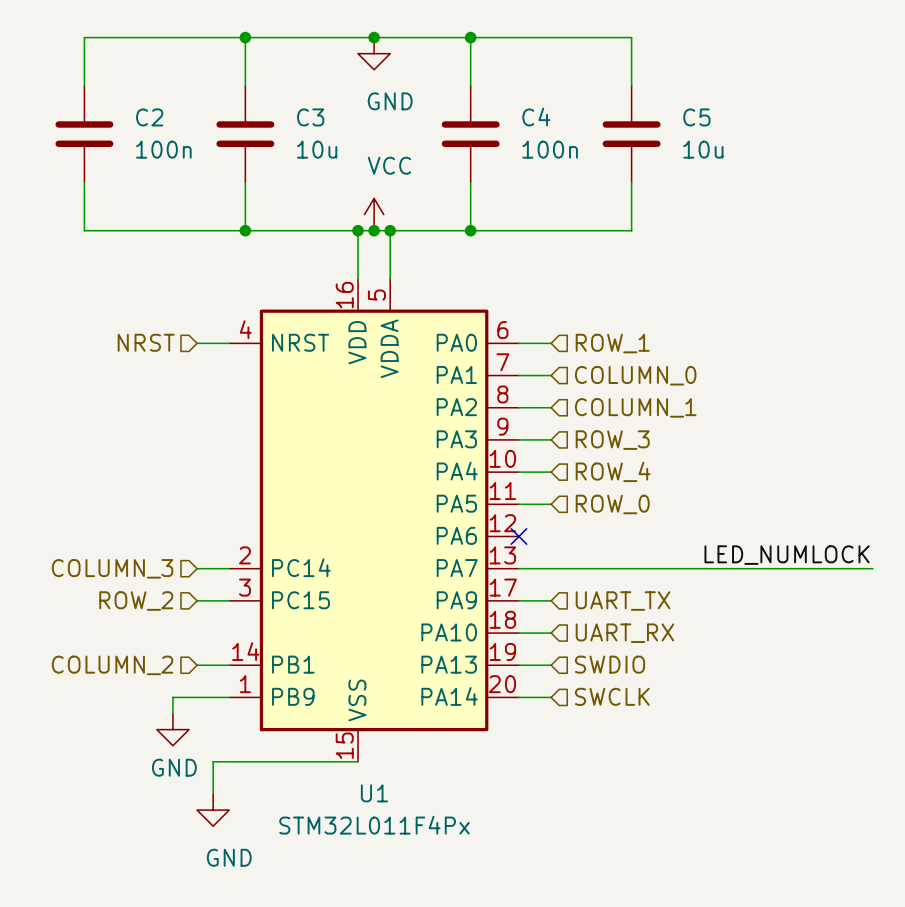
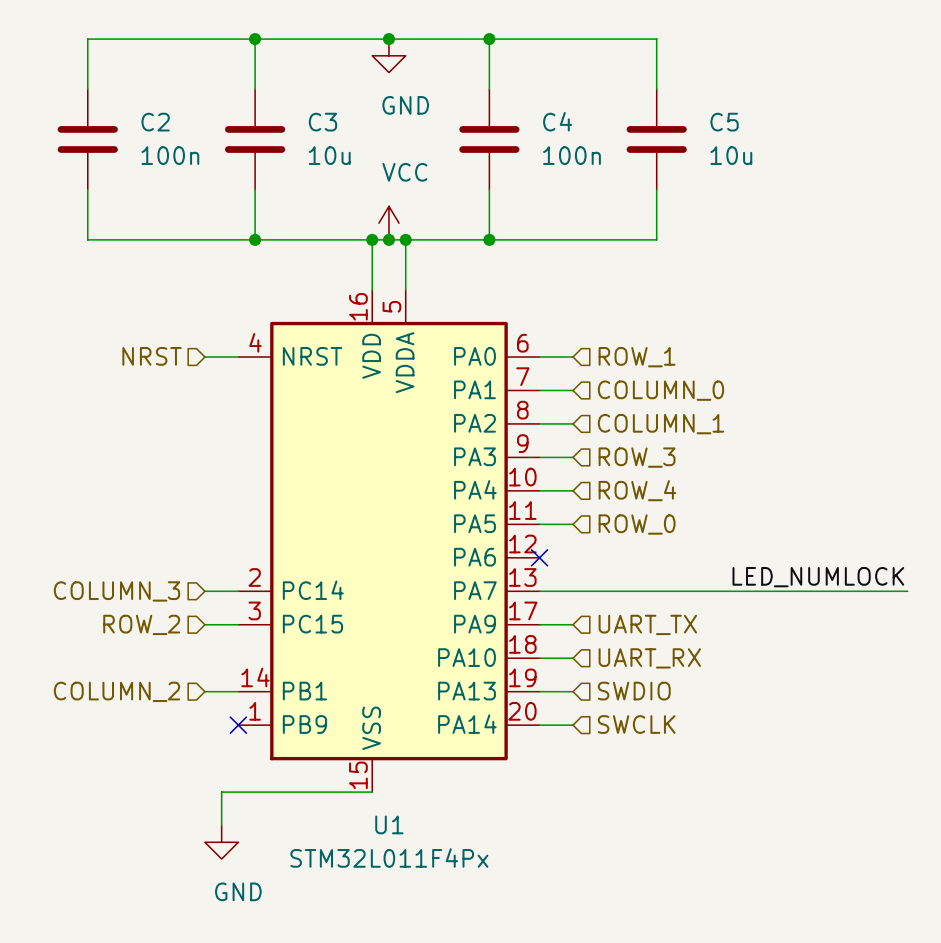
wire: (229, 697) (172, 697) (172, 713) -> none
no-connect mark: none -> (238, 725)
power symbol: GND (172, 729) -> none

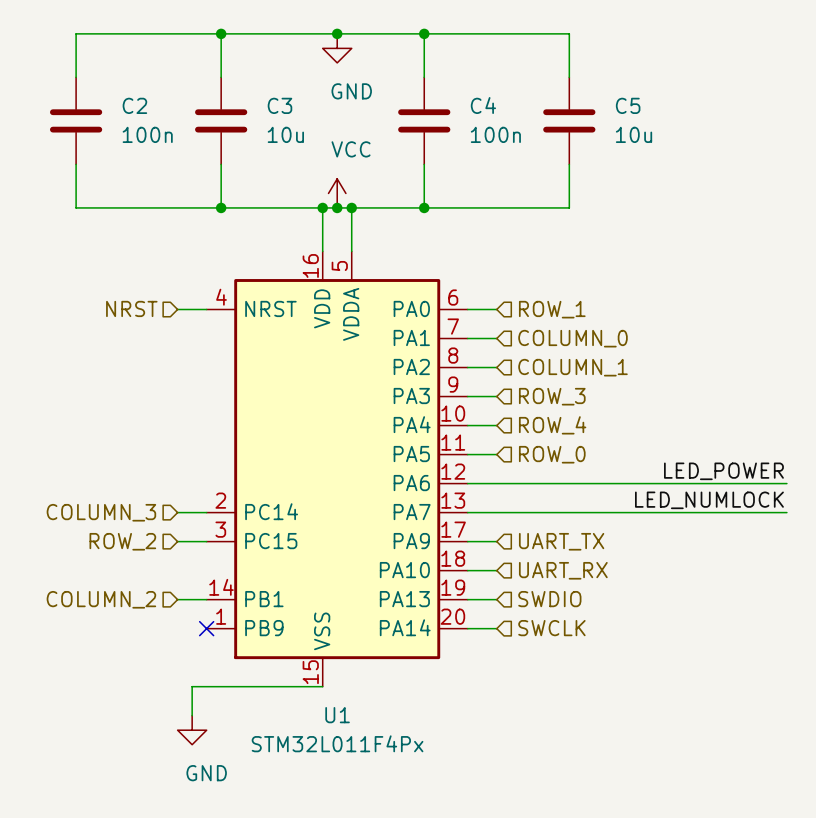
label: none -> LED_POWER (723, 471)
wire: none -> (467, 483) (786, 483)
no-connect mark: (539, 557) -> none

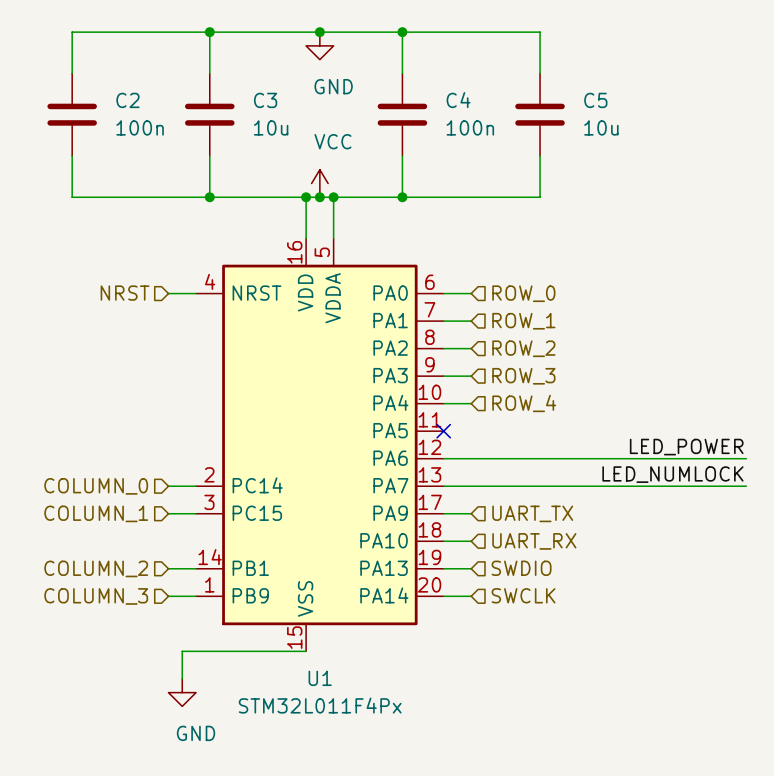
hierarchical label: ROW_1 (552, 309) -> ROW_0 (523, 293)
hierarchical label: COLUMN_0 (573, 338) -> ROW_1 (523, 321)
hierarchical label: COLUMN_1 (573, 367) -> ROW_2 (523, 348)
wire: (467, 454) (496, 454) -> none
no-connect mark: none -> (443, 431)
hierarchical label: ROW_0 (552, 454) -> none
hierarchical label: COLUMN_3 (101, 512) -> COLUMN_0 (96, 486)
hierarchical label: ROW_2 (122, 541) -> COLUMN_1 (96, 513)
hierarchical label: none -> COLUMN_3 (96, 596)
wire: none -> (168, 596) (196, 596)
no-connect mark: (206, 628) -> none

